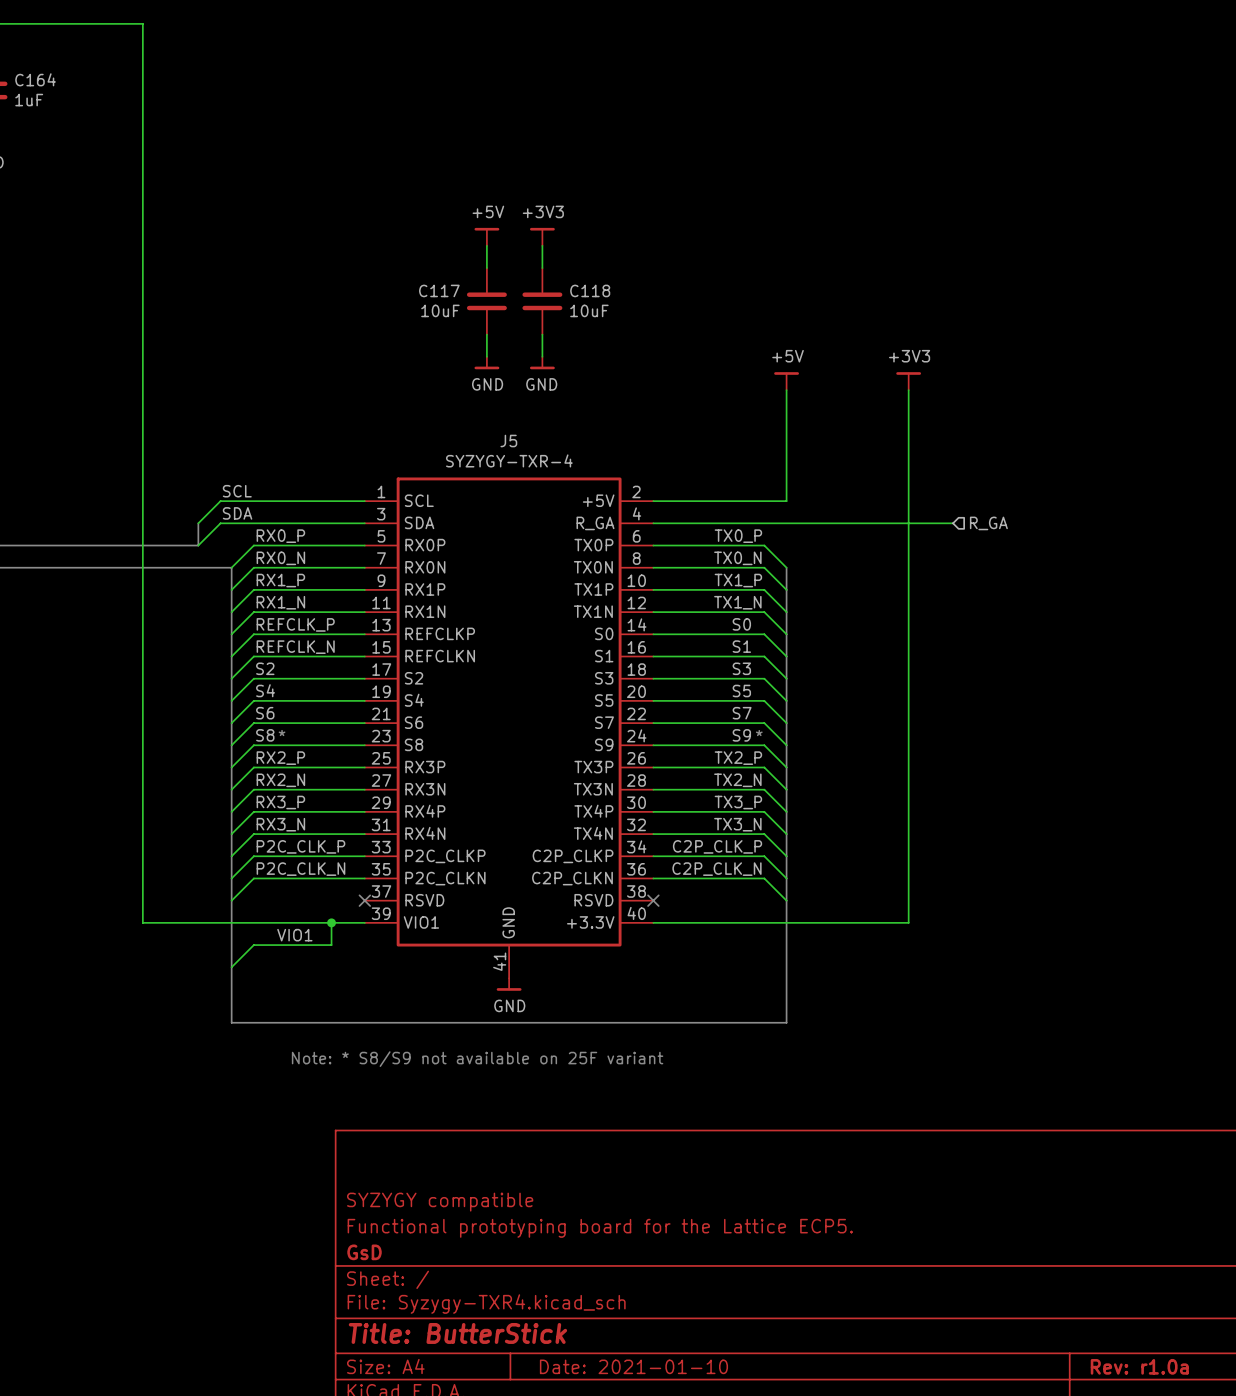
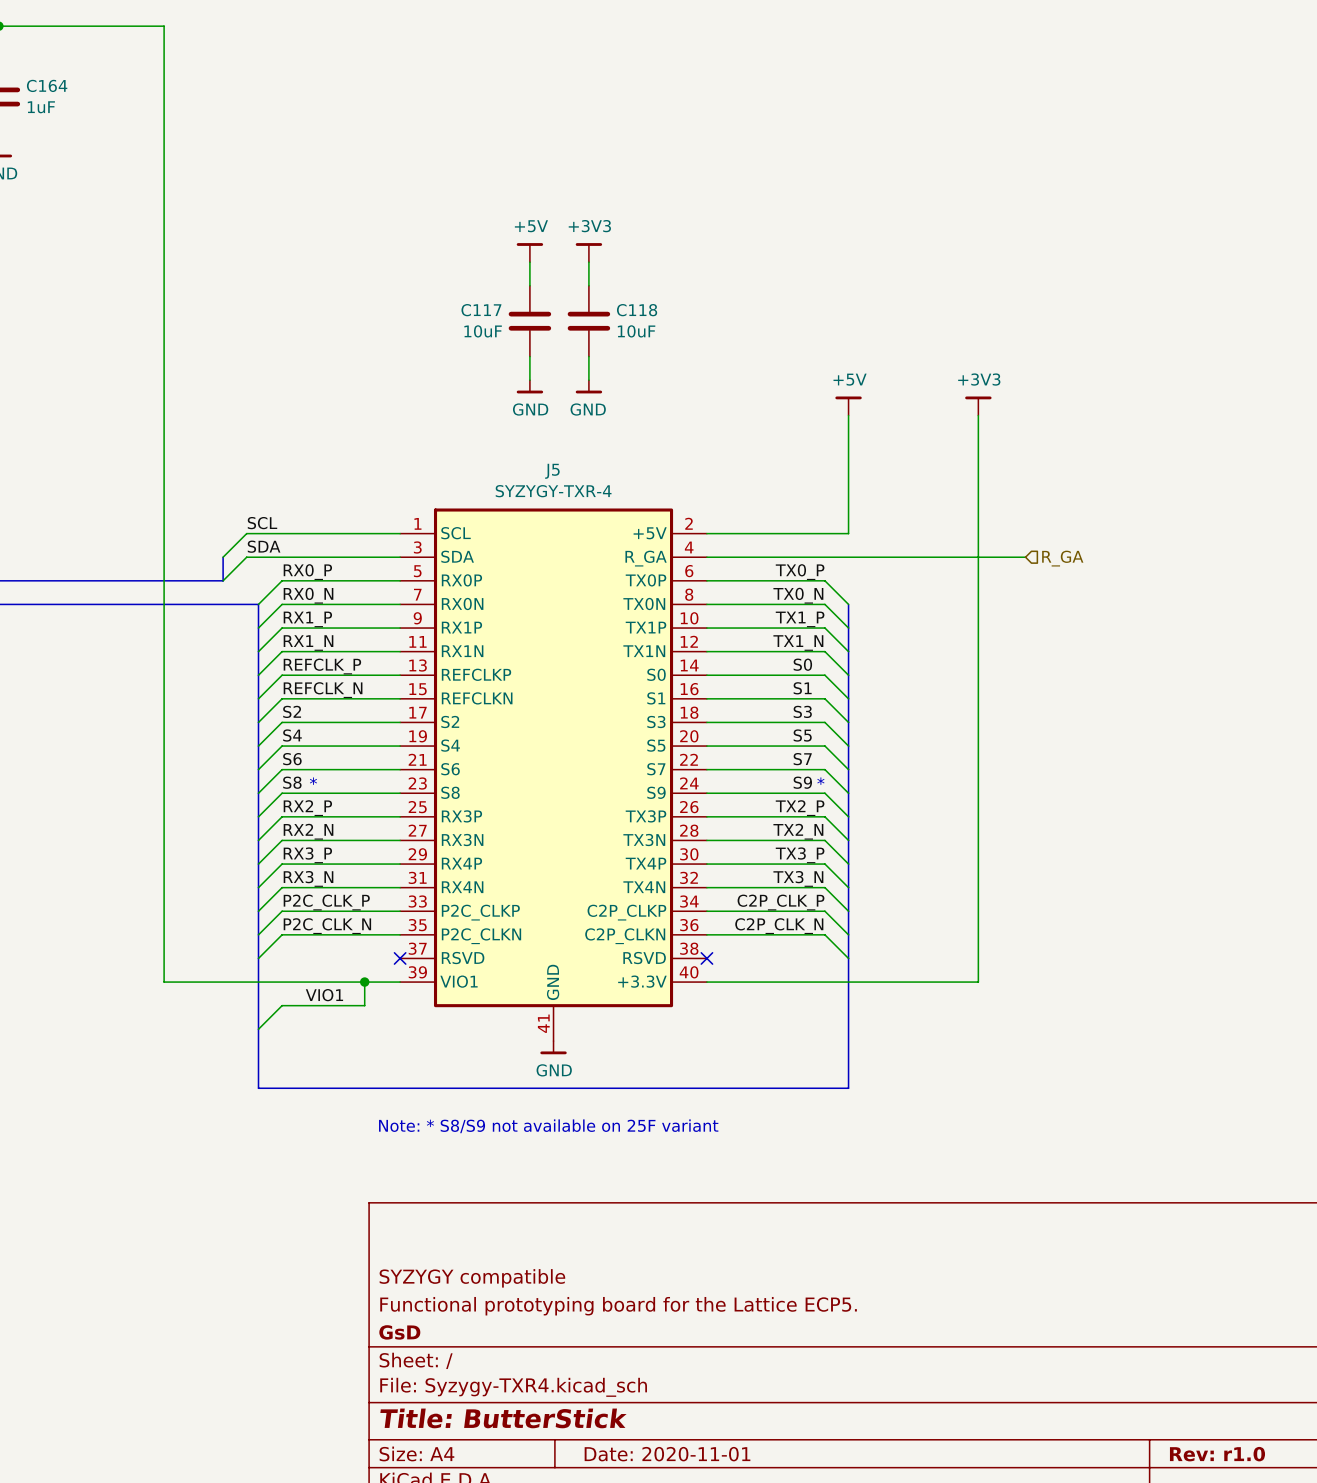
title block: Date: 2021-01-10 (633, 1366) -> Date: 2020-11-01 (667, 1454)
title block: Rev: r1.0a (1139, 1366) -> Rev: r1.0 (1217, 1454)

